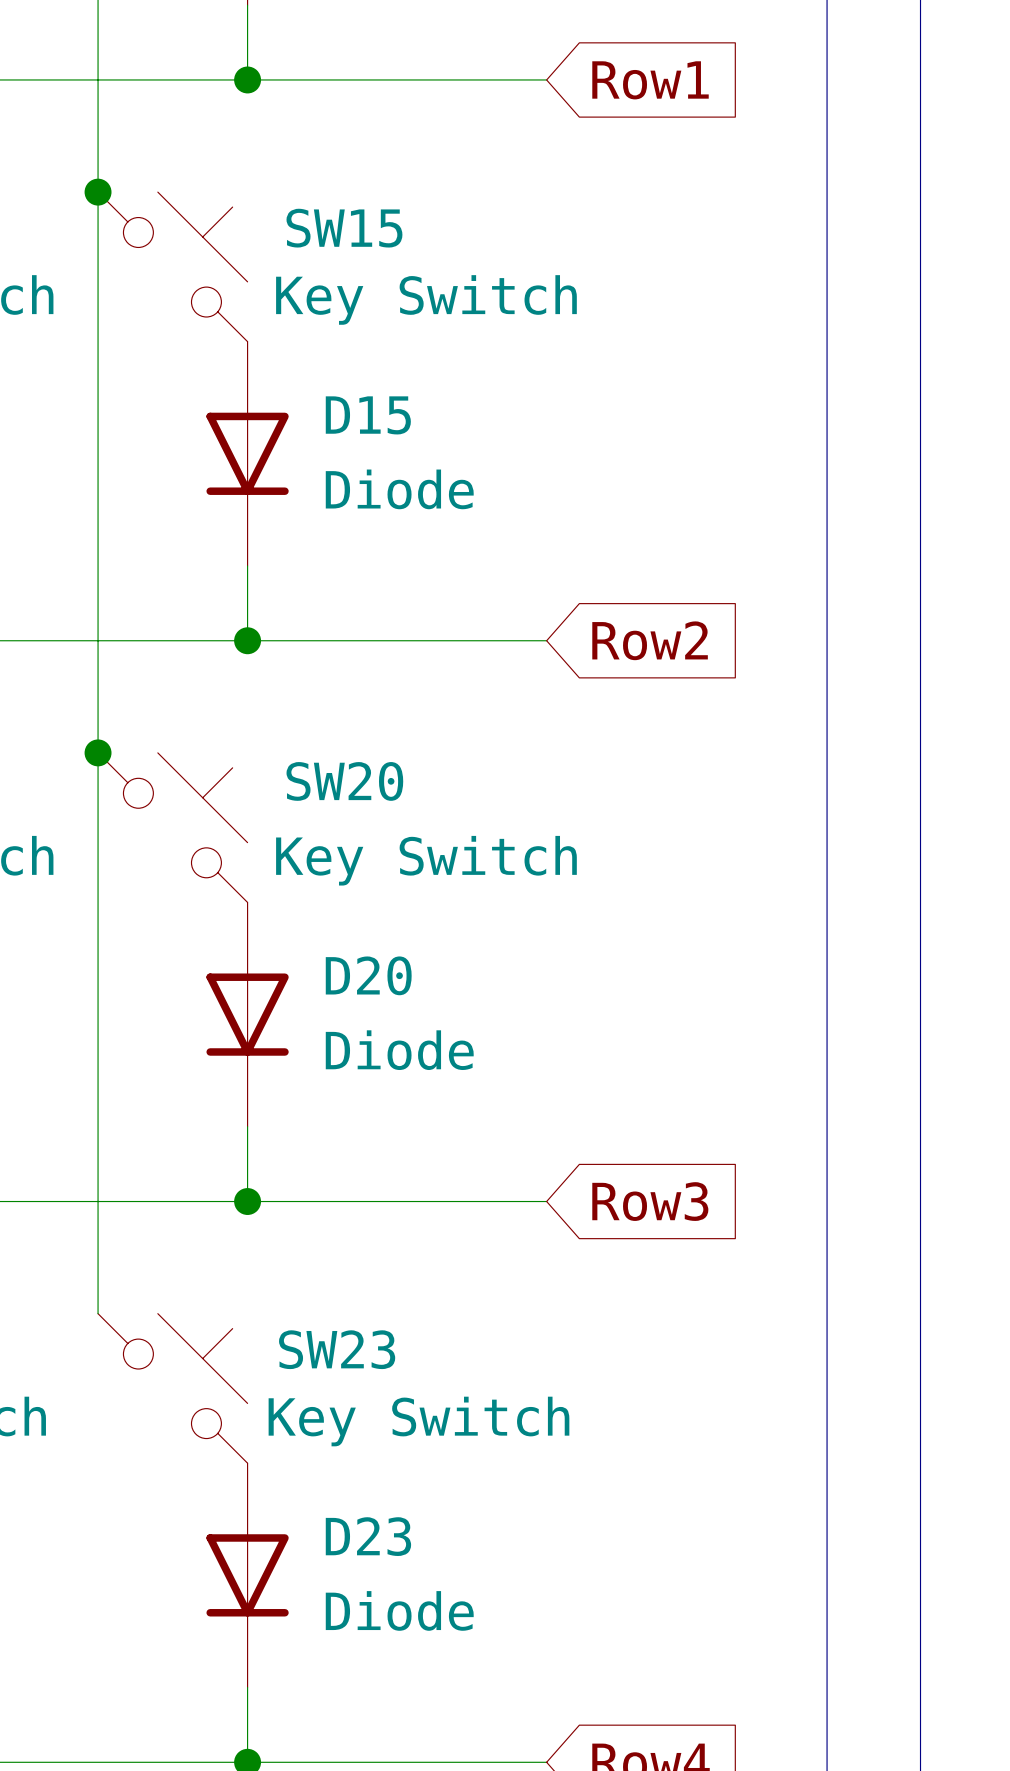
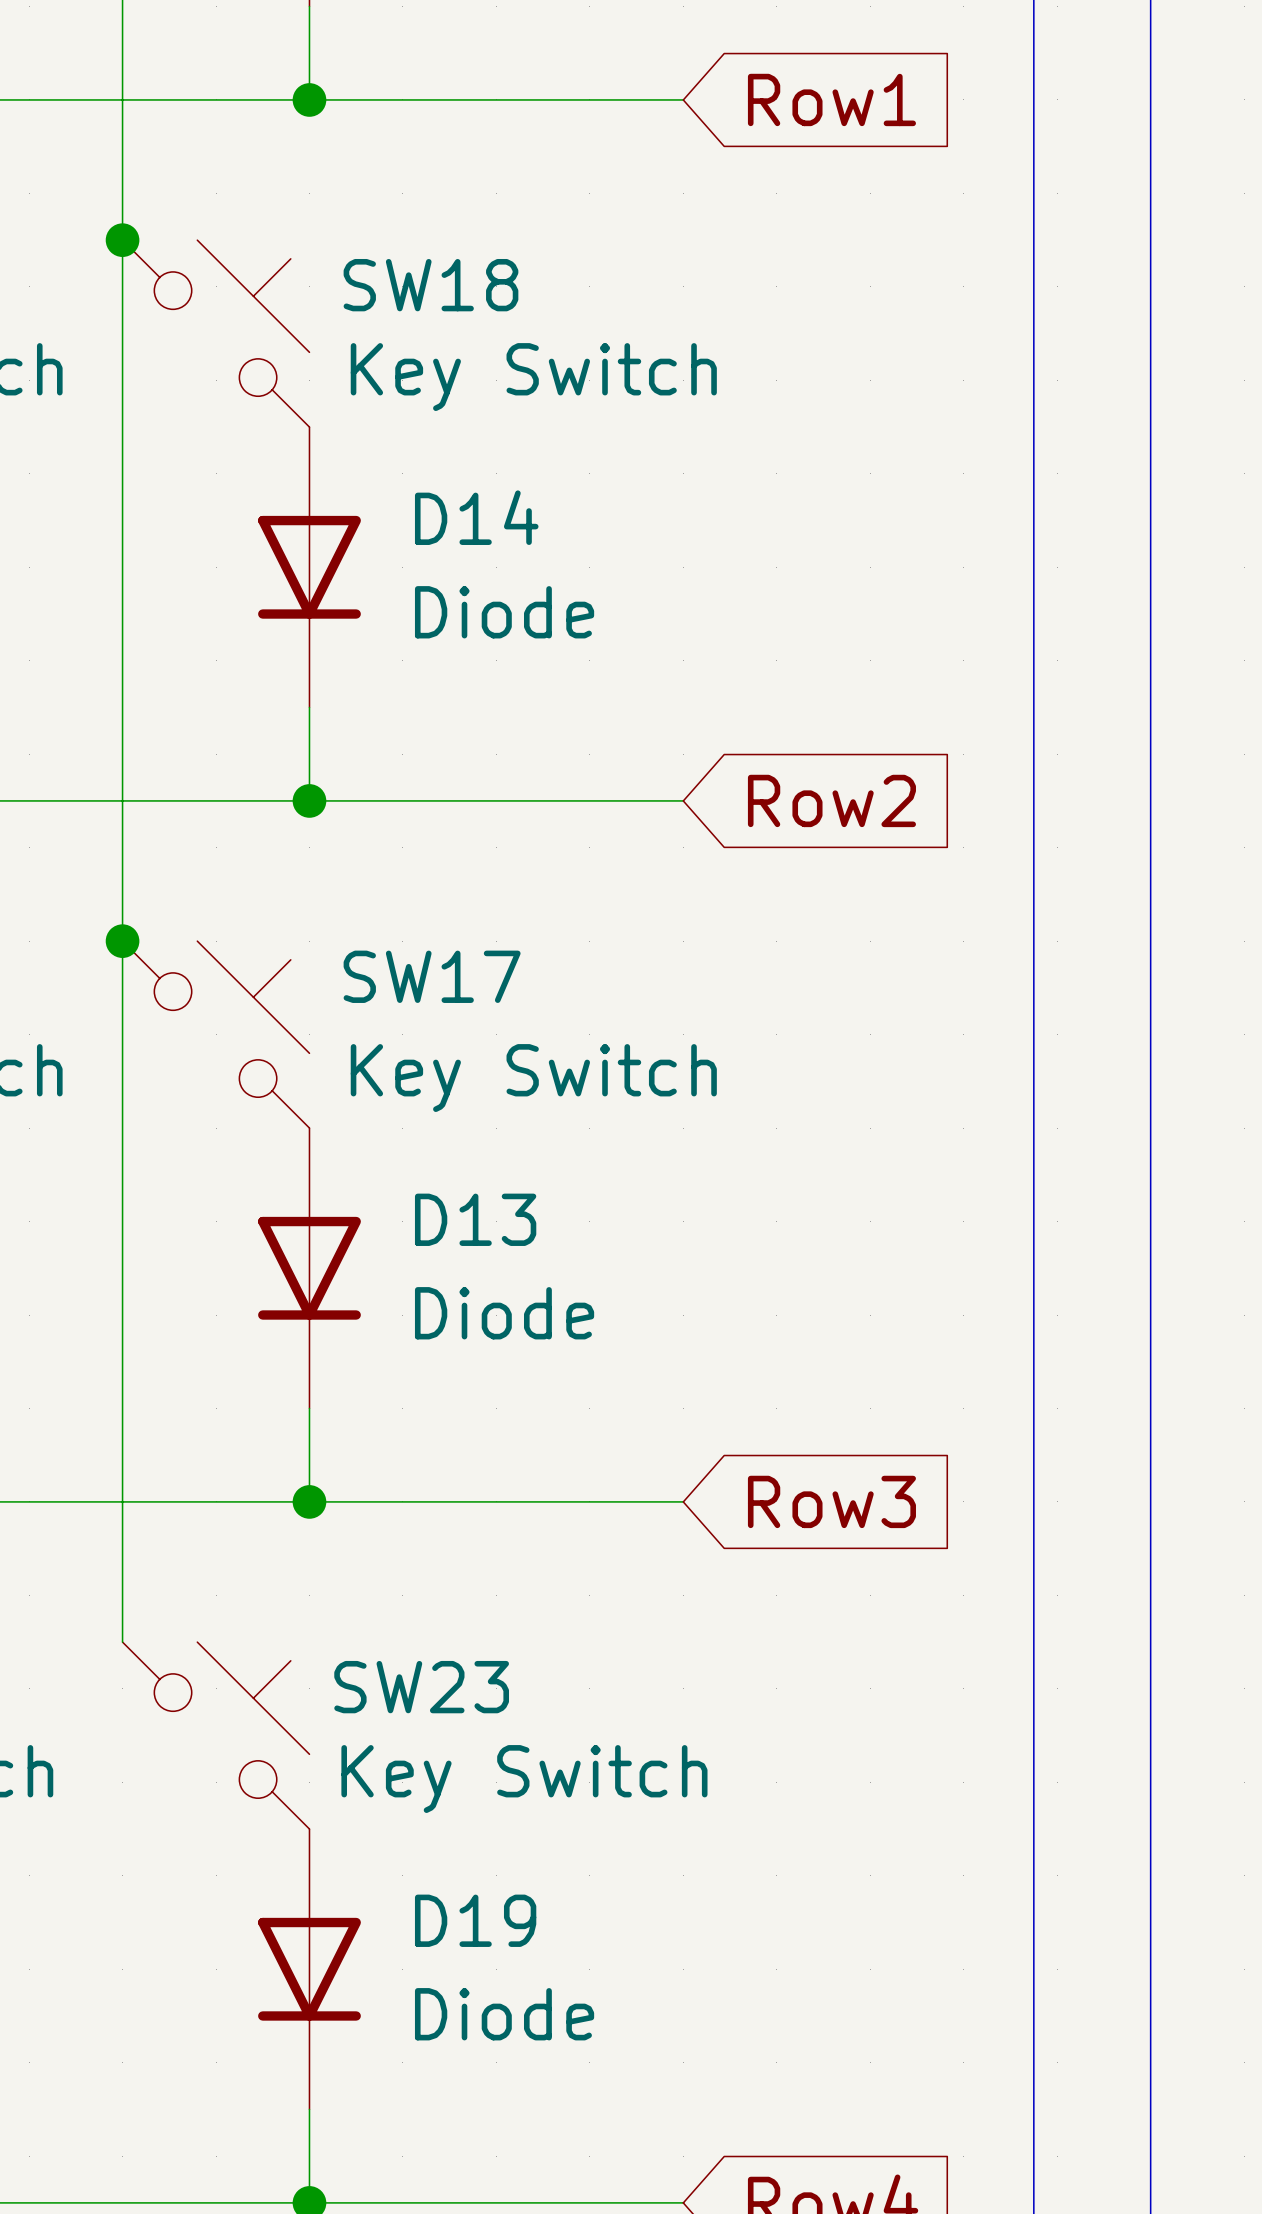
SW15 name: SW15 (344, 228) -> SW18 (430, 285)
D15 name: D15 (368, 415) -> D14 (476, 517)
SW20 name: SW20 (344, 781) -> SW17 (432, 976)
D20 name: D20 (368, 975) -> D13 (475, 1219)
D23 name: D23 (368, 1536) -> D19 (475, 1920)

